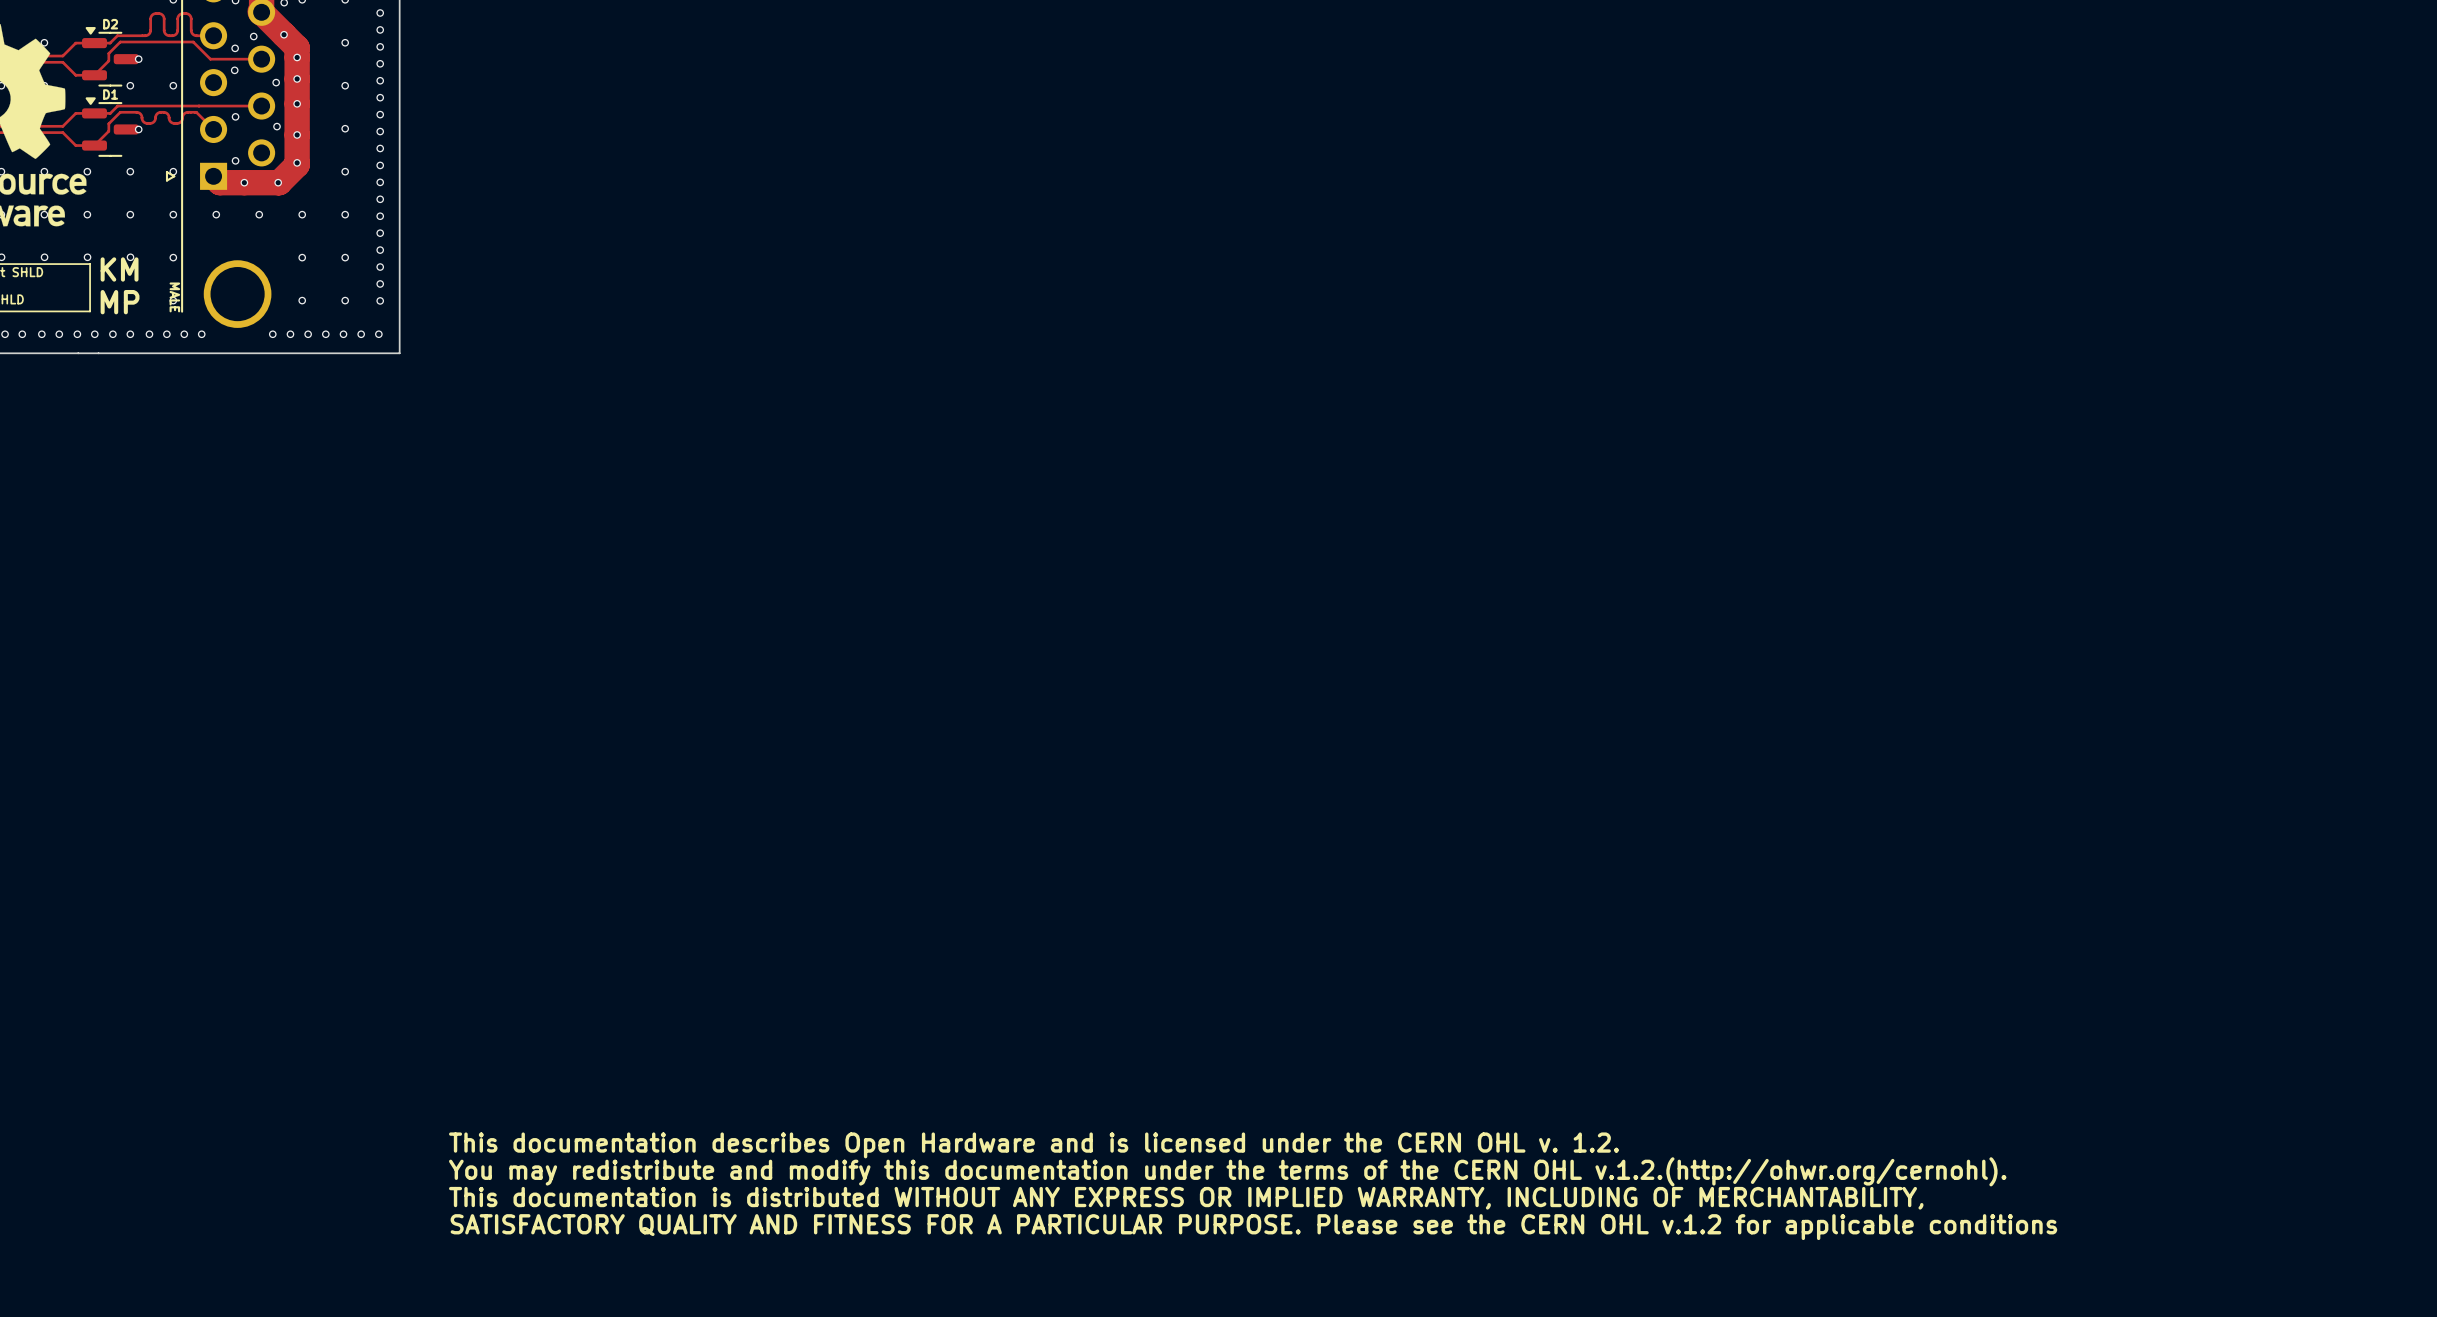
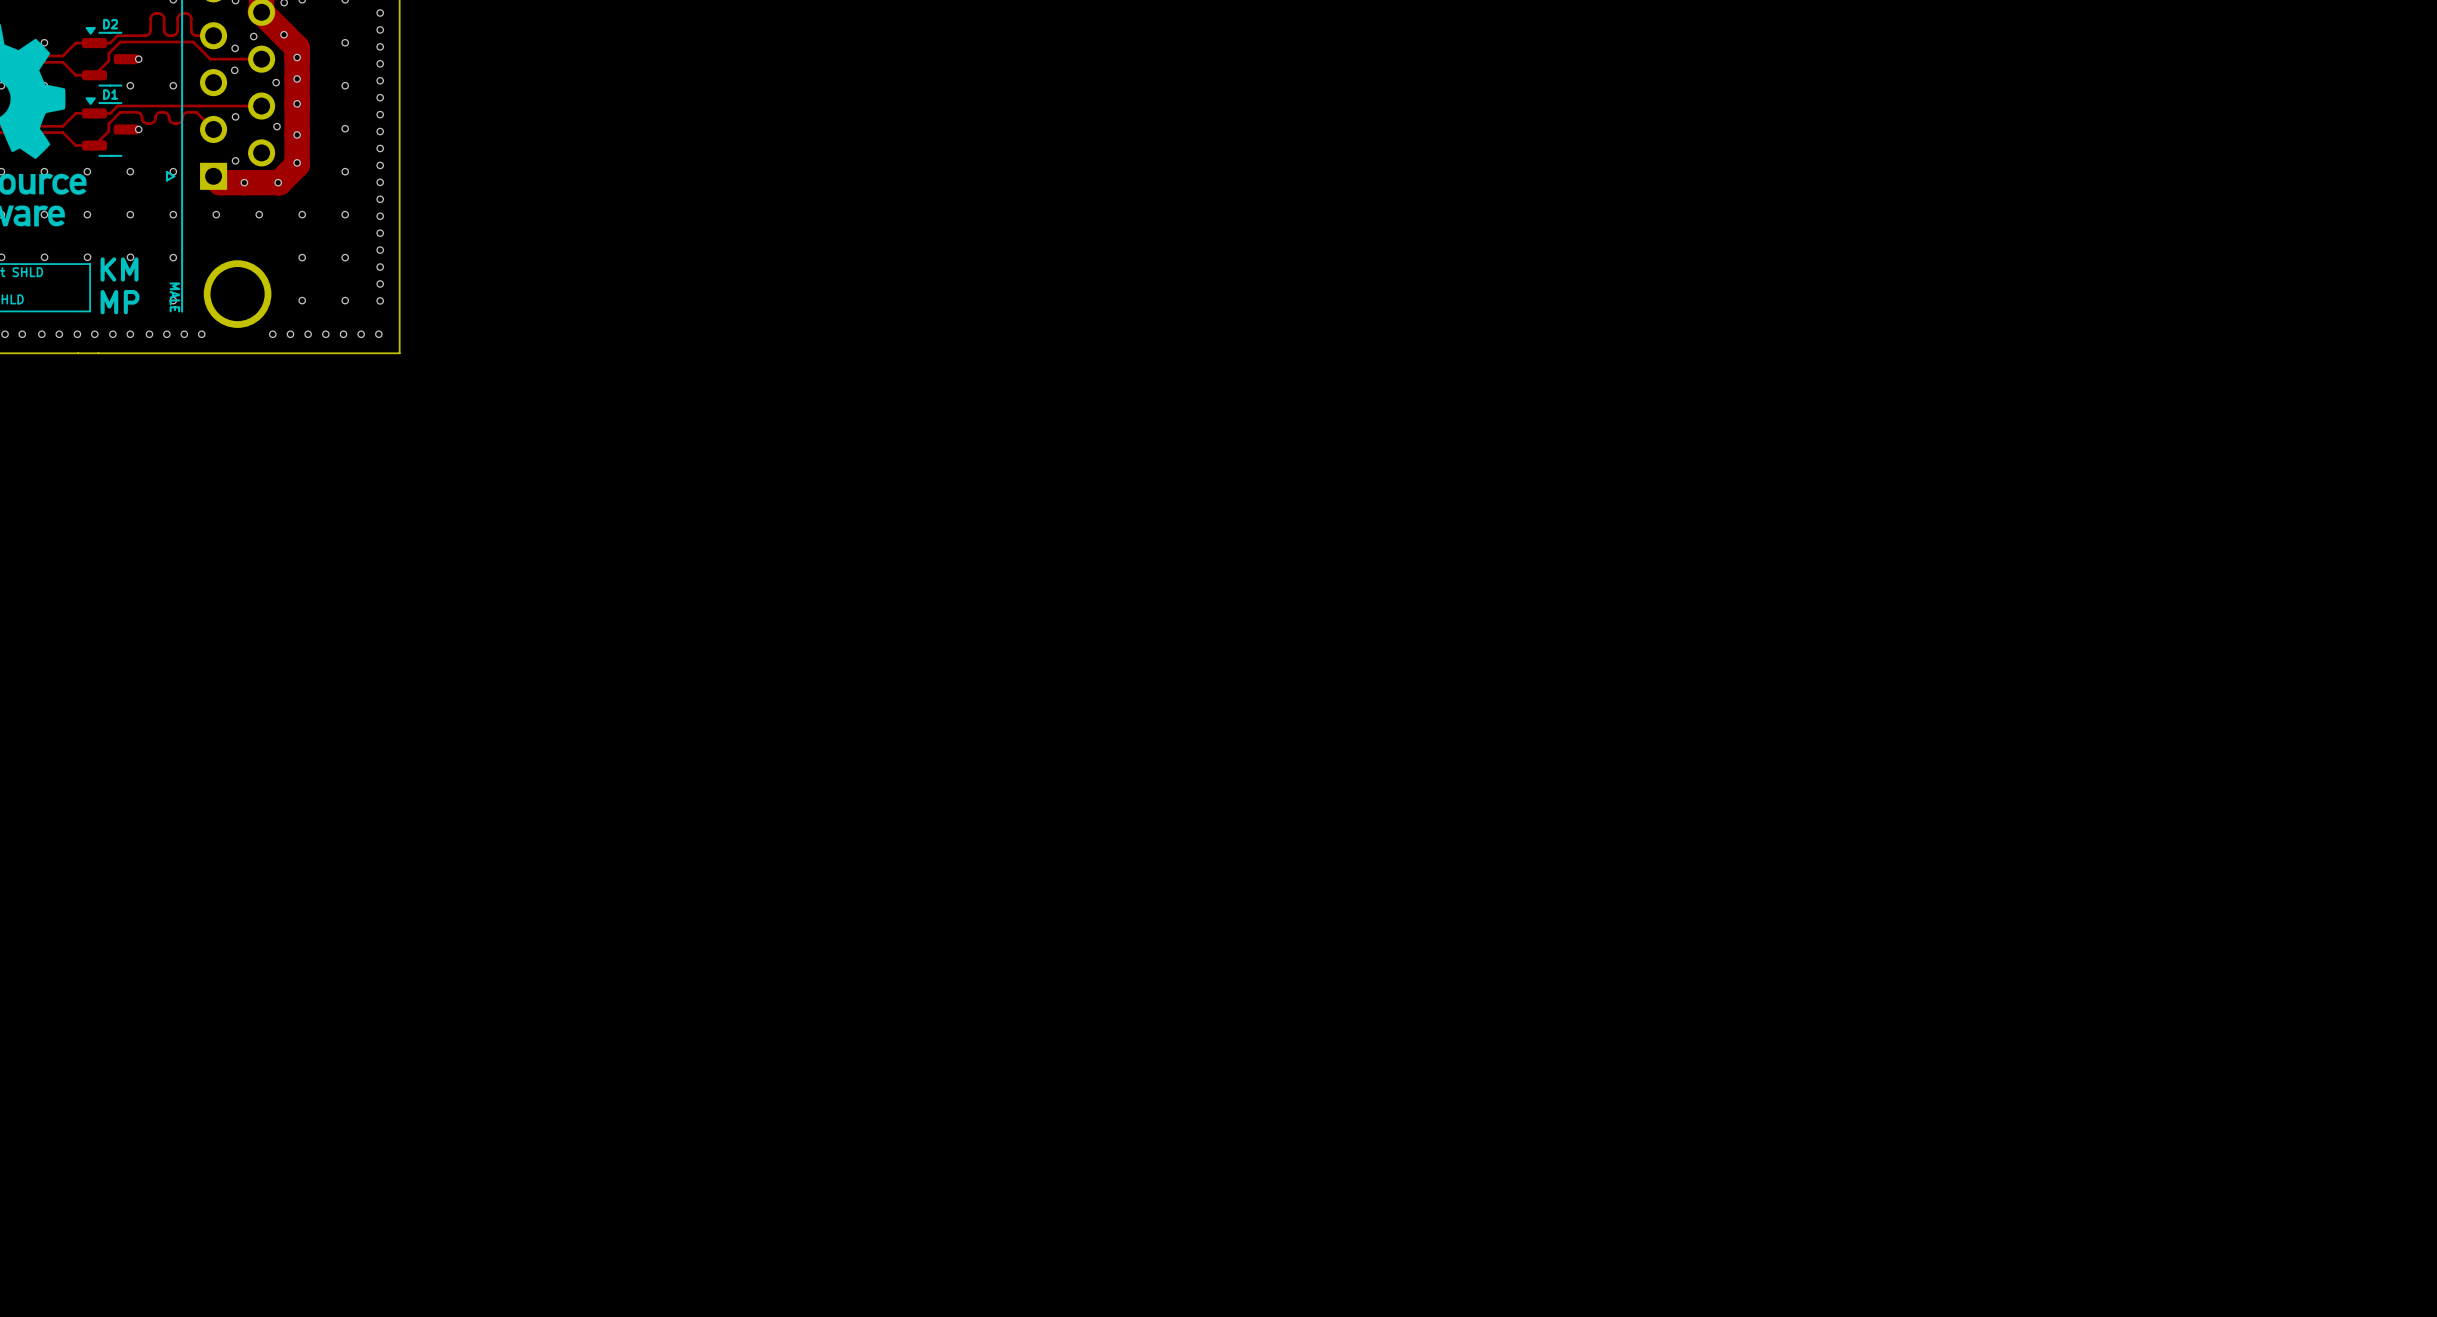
text: This documentation describes Open Hardware and is licensed under the CERN OHL v. 1.2. (1033, 1145) -> none
text: You may redistribute and modify this documentation under the terms of the CERN OHL v.1.2.(http://ohwr.org/cernohl). (1227, 1171) -> none
text: This documentation is distributed WITHOUT ANY EXPRESS OR IMPLIED WARRANTY, INCLUDING OF MERCHANTABILITY, (1186, 1198) -> none
text: SATISFACTORY QUALITY AND FITNESS FOR A PARTICULAR PURPOSE. Please see the CERN OHL v.1.2 for applicable conditions (1253, 1227) -> none

